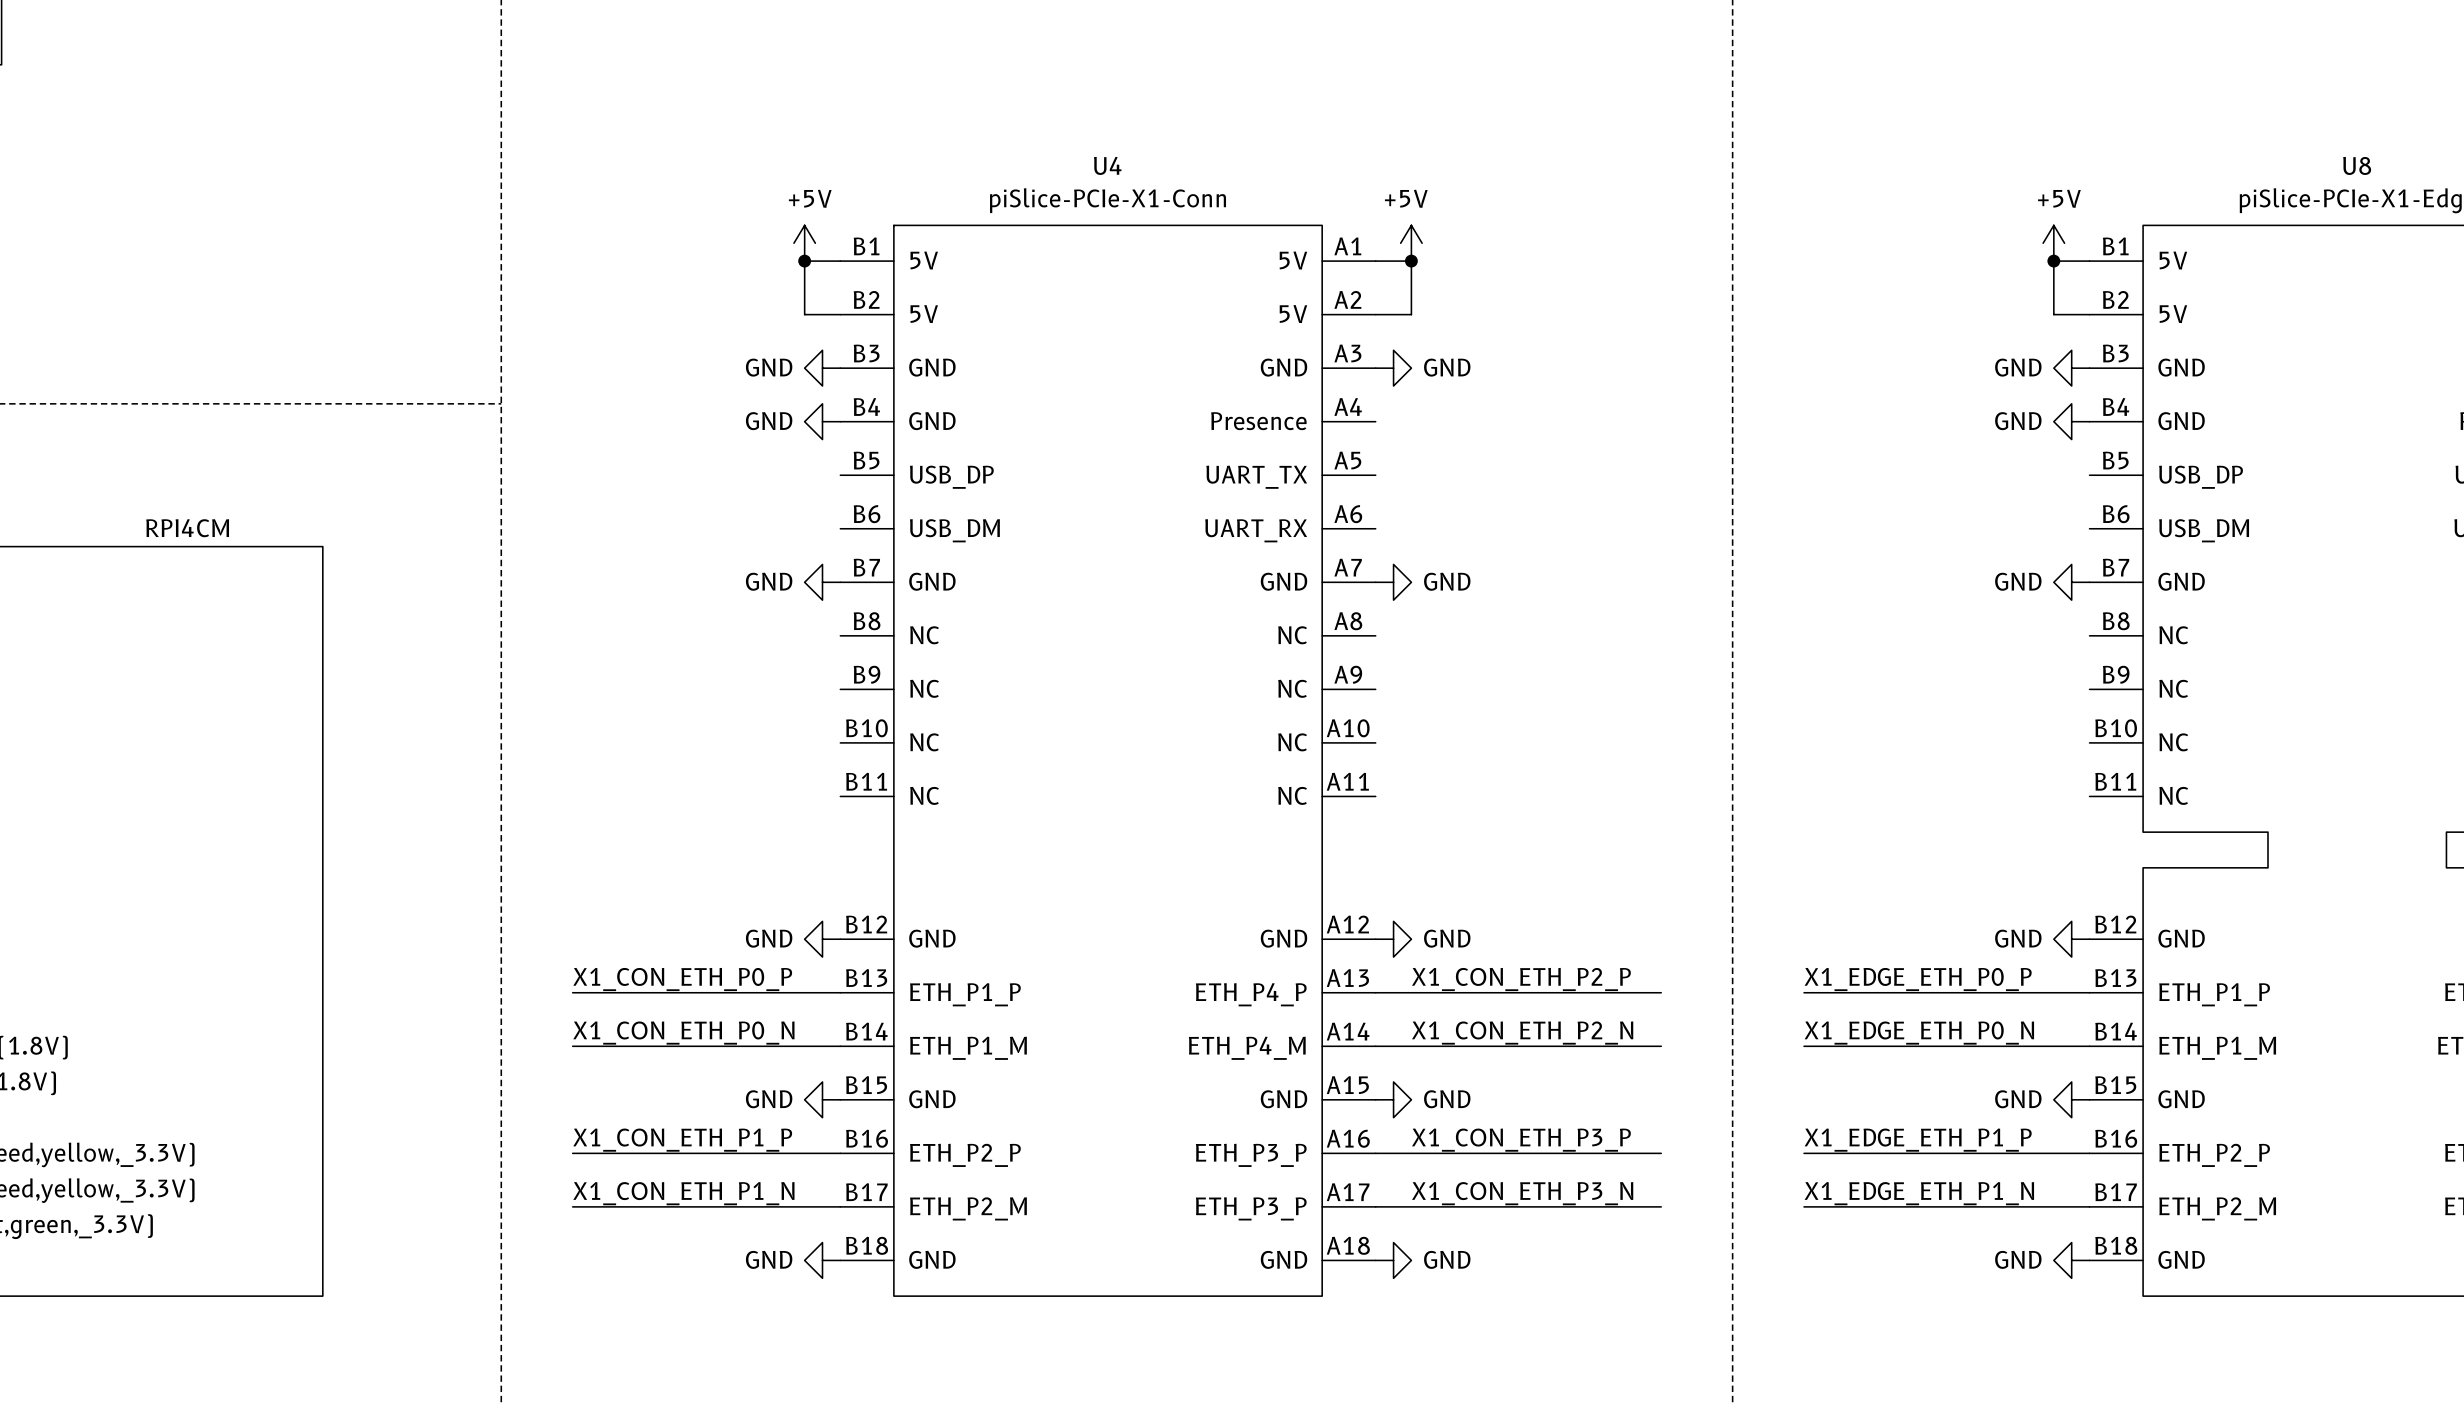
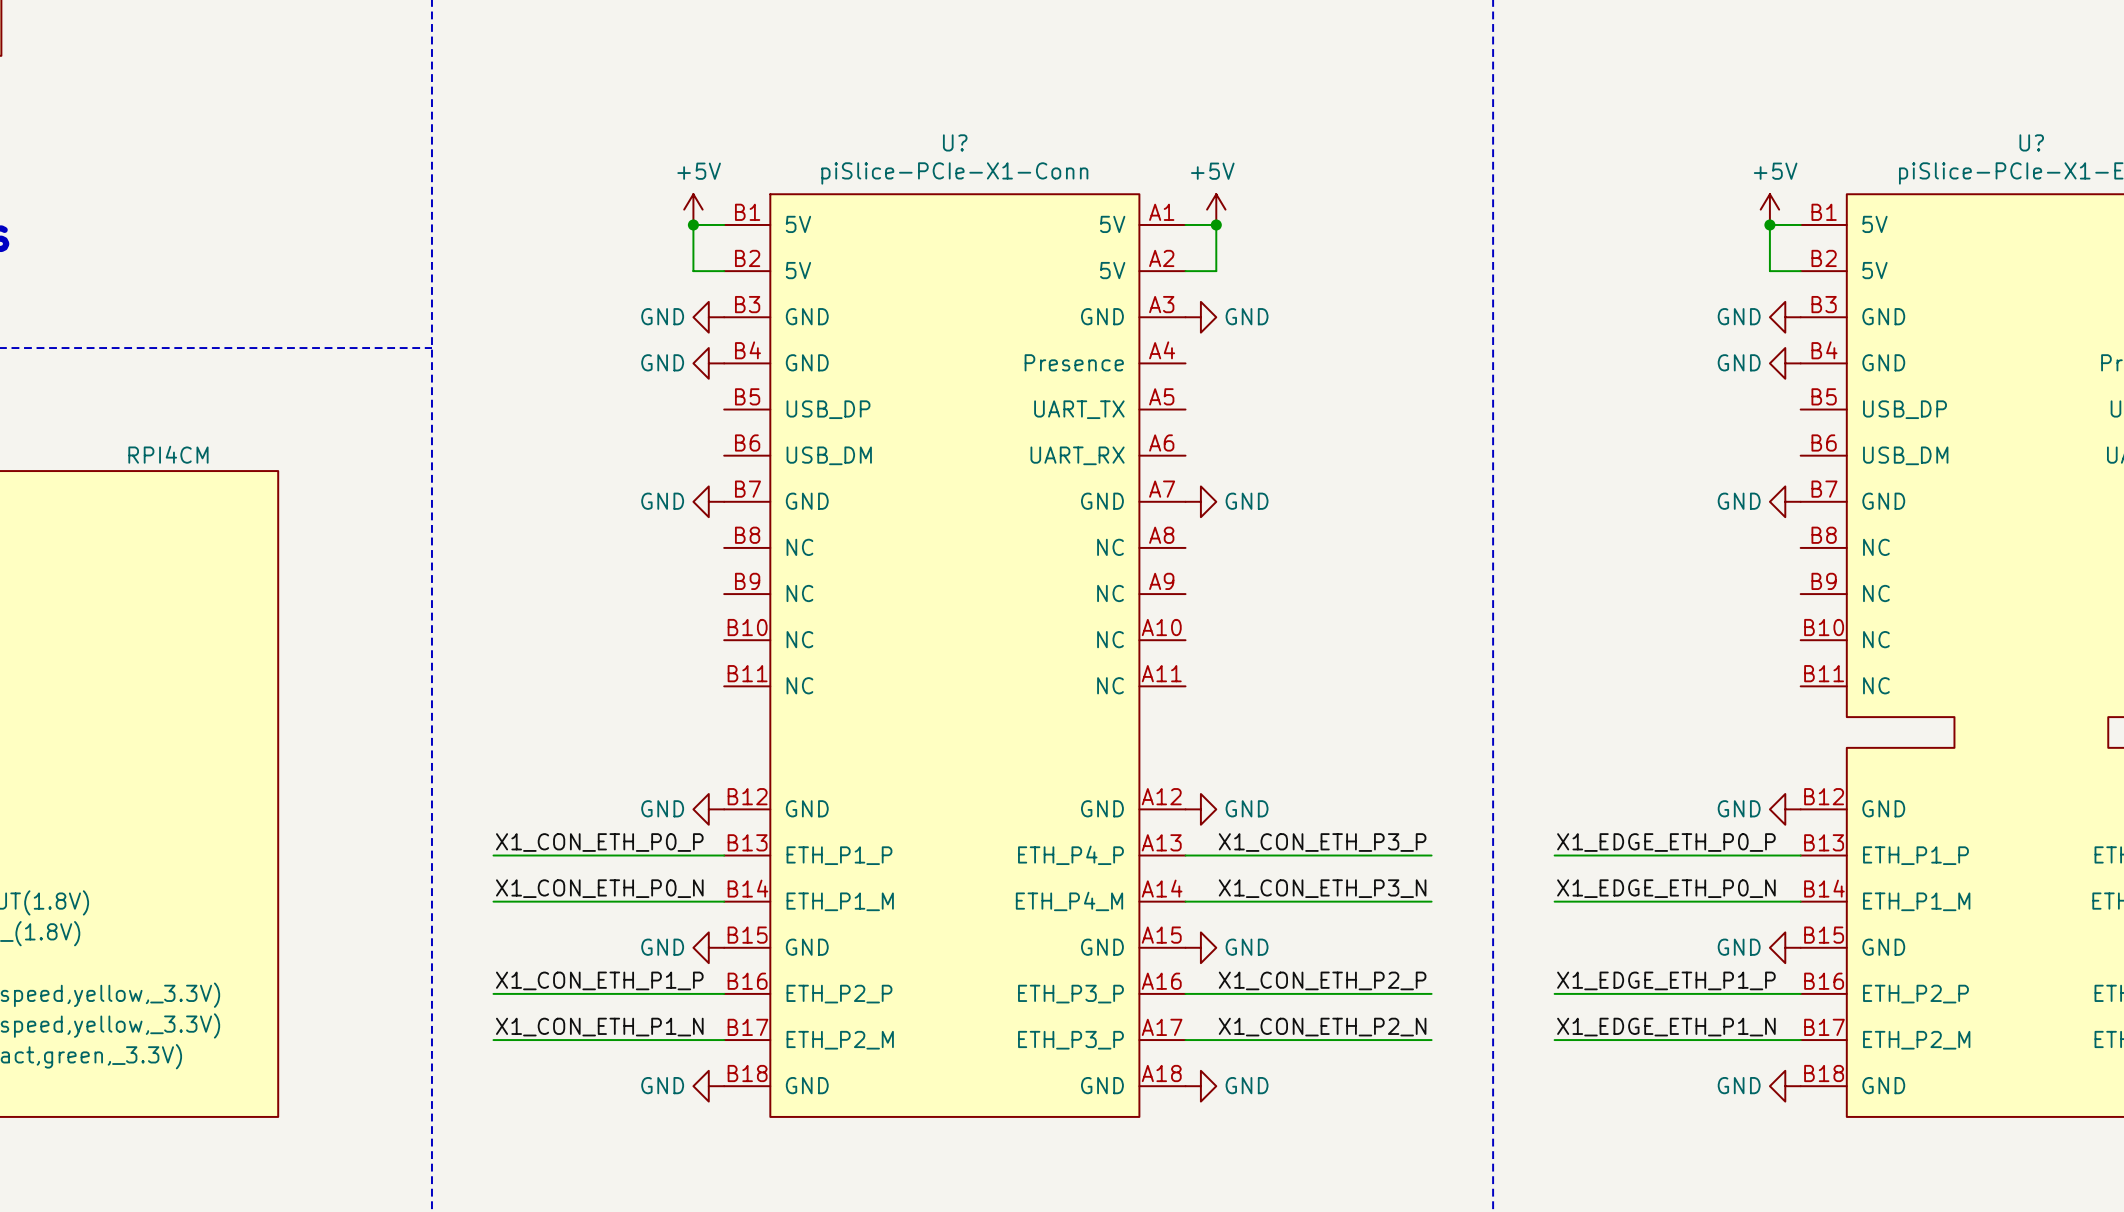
U4 name: U4 (1107, 165) -> U? (955, 142)
U8 name: U8 (2357, 165) -> U? (2031, 142)
label: X1_CON_ETH_P2_P (1521, 979) -> X1_CON_ETH_P3_P (1322, 842)
label: X1_CON_ETH_P2_N (1522, 1033) -> X1_CON_ETH_P3_N (1322, 888)
label: X1_CON_ETH_P3_P (1521, 1140) -> X1_CON_ETH_P2_P (1322, 980)
label: X1_CON_ETH_P3_N (1522, 1193) -> X1_CON_ETH_P2_N (1322, 1027)

